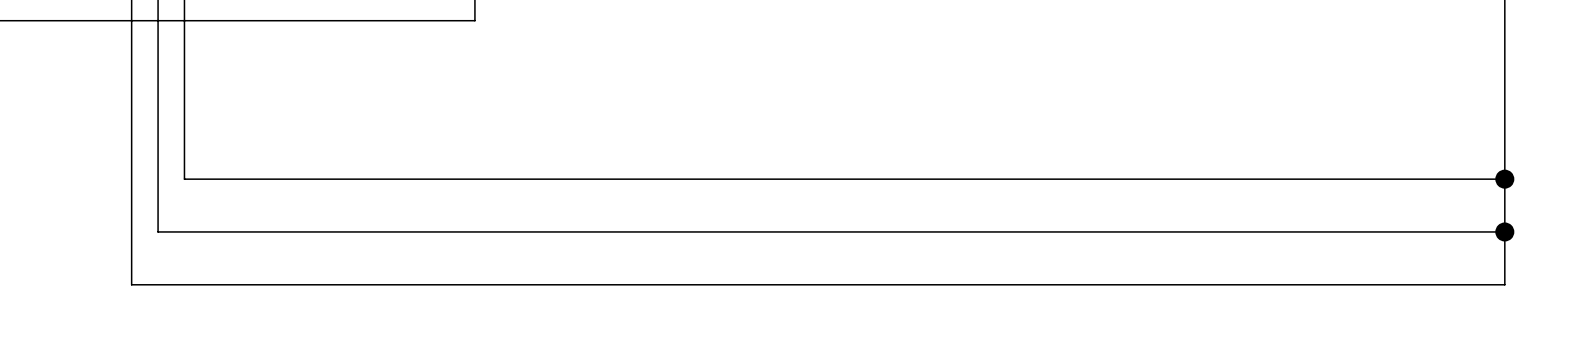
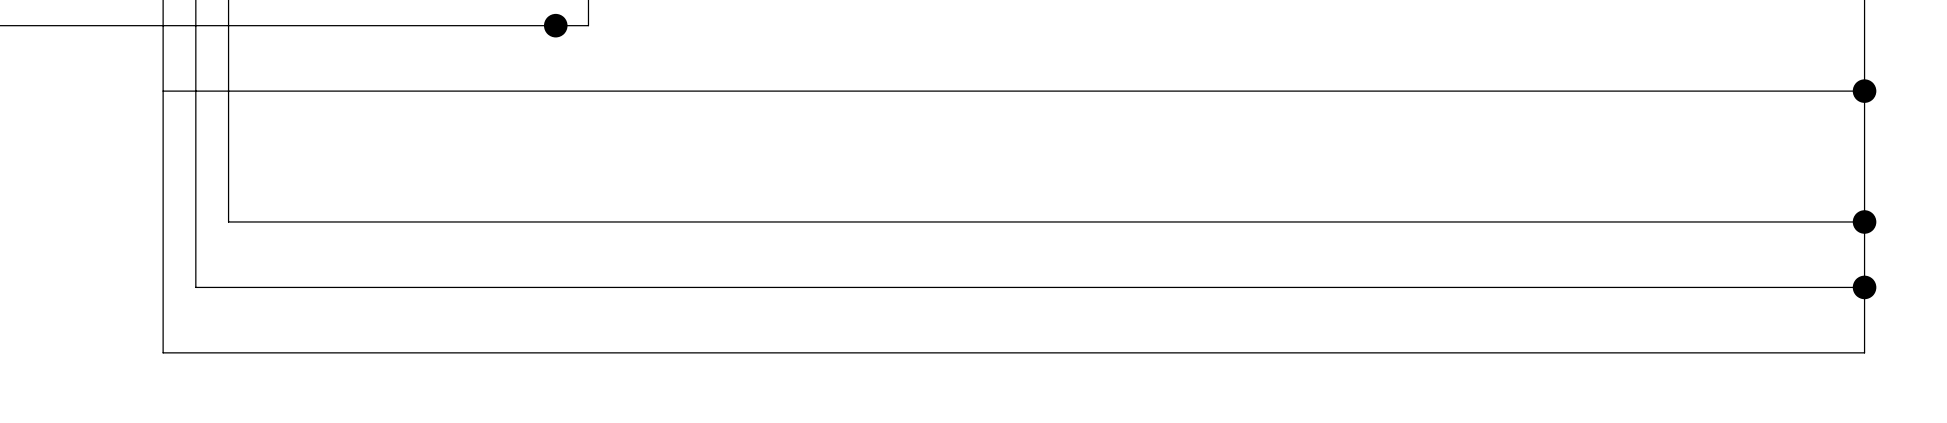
junction: none -> (555, 25)
wire: none -> (163, 91) (1864, 91)
junction: none -> (1864, 91)

